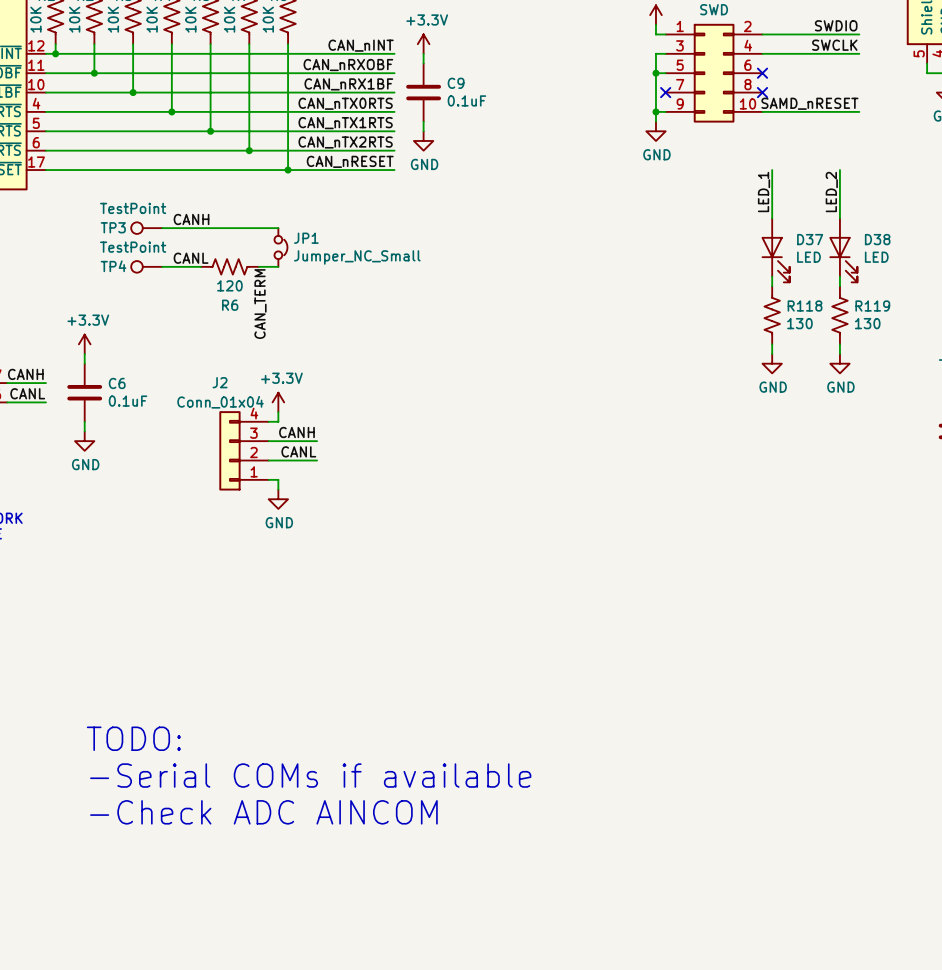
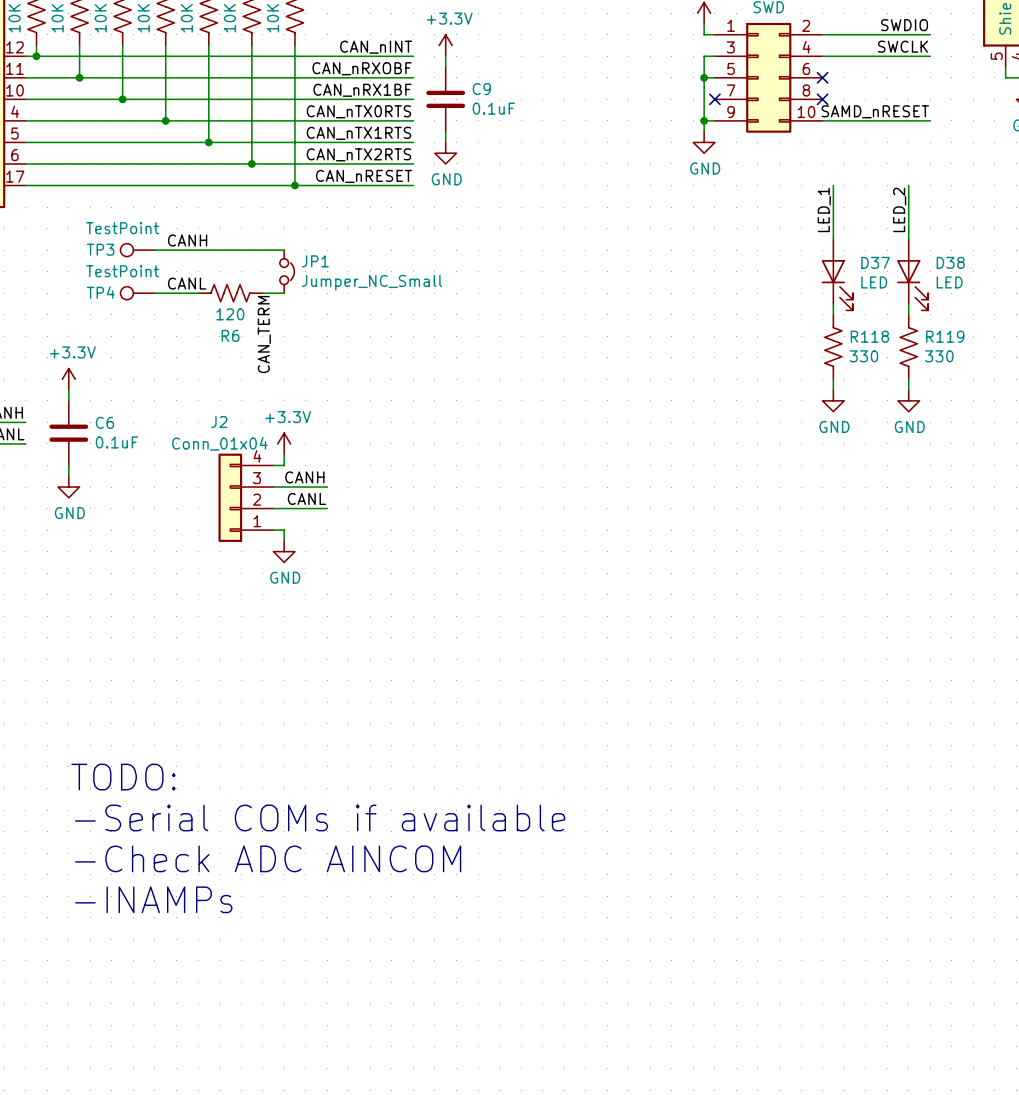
R118 value: 130 (799, 323) -> 330 (863, 356)
R119 value: 130 (867, 323) -> 330 (939, 356)
text: none -> TODO: (123, 777)
text: TODO: (133, 738) -> -Serial COMs if available (320, 817)
text: -Serial COMs if available (310, 775) -> -Check ADC AINCOM (268, 858)
text: -Check ADC AINCOM (263, 812) -> -INAMPs (153, 899)

